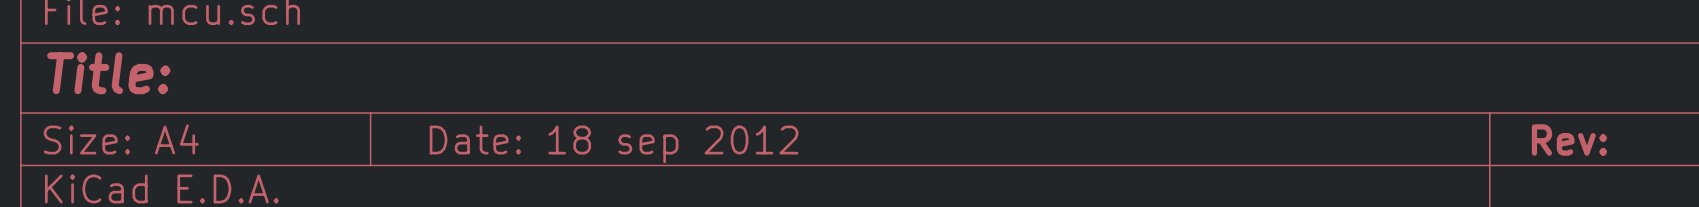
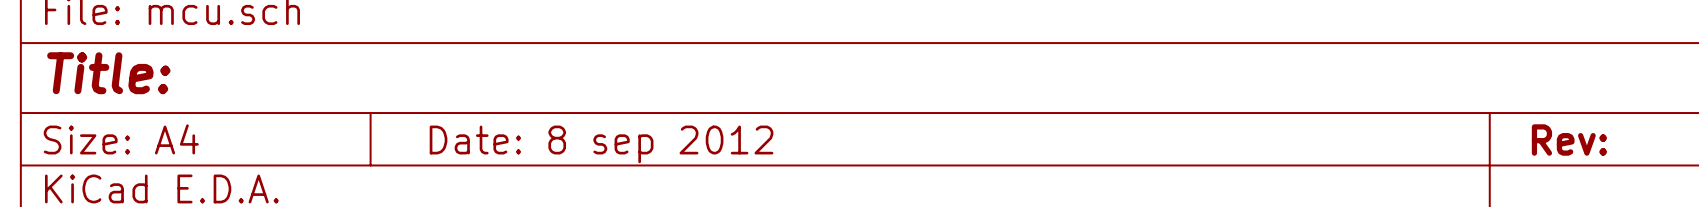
title block: Date: 18 sep 2012 (614, 144) -> Date: 8 sep 2012 (601, 144)

